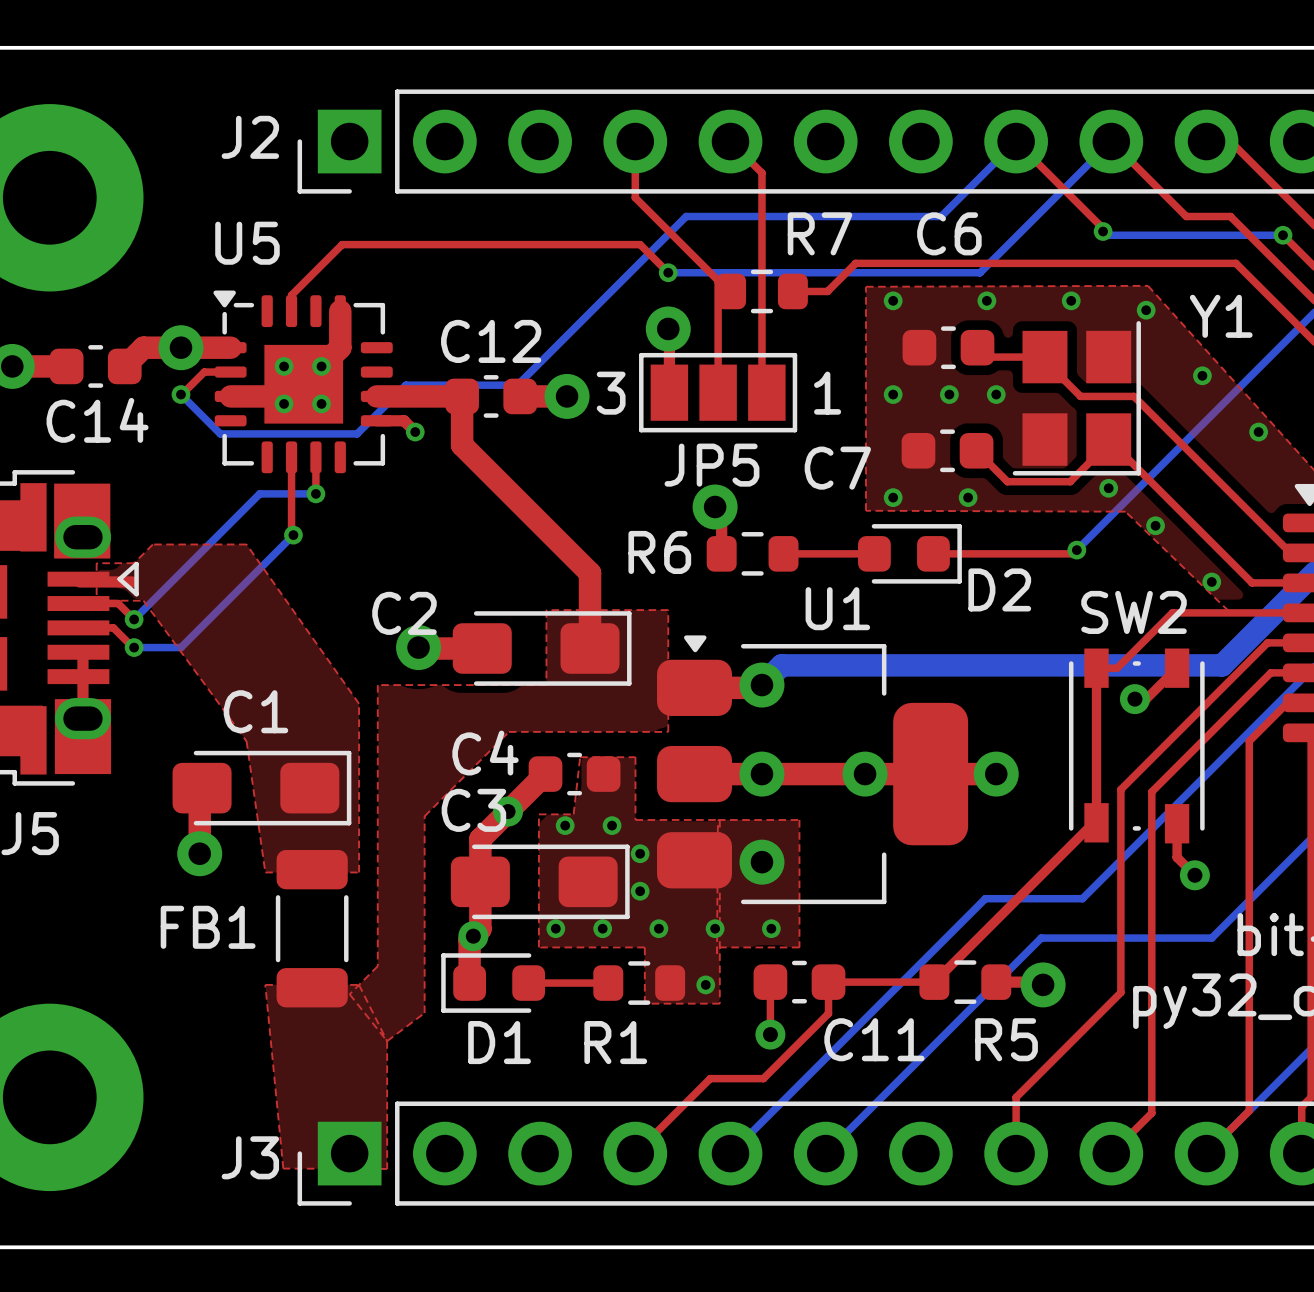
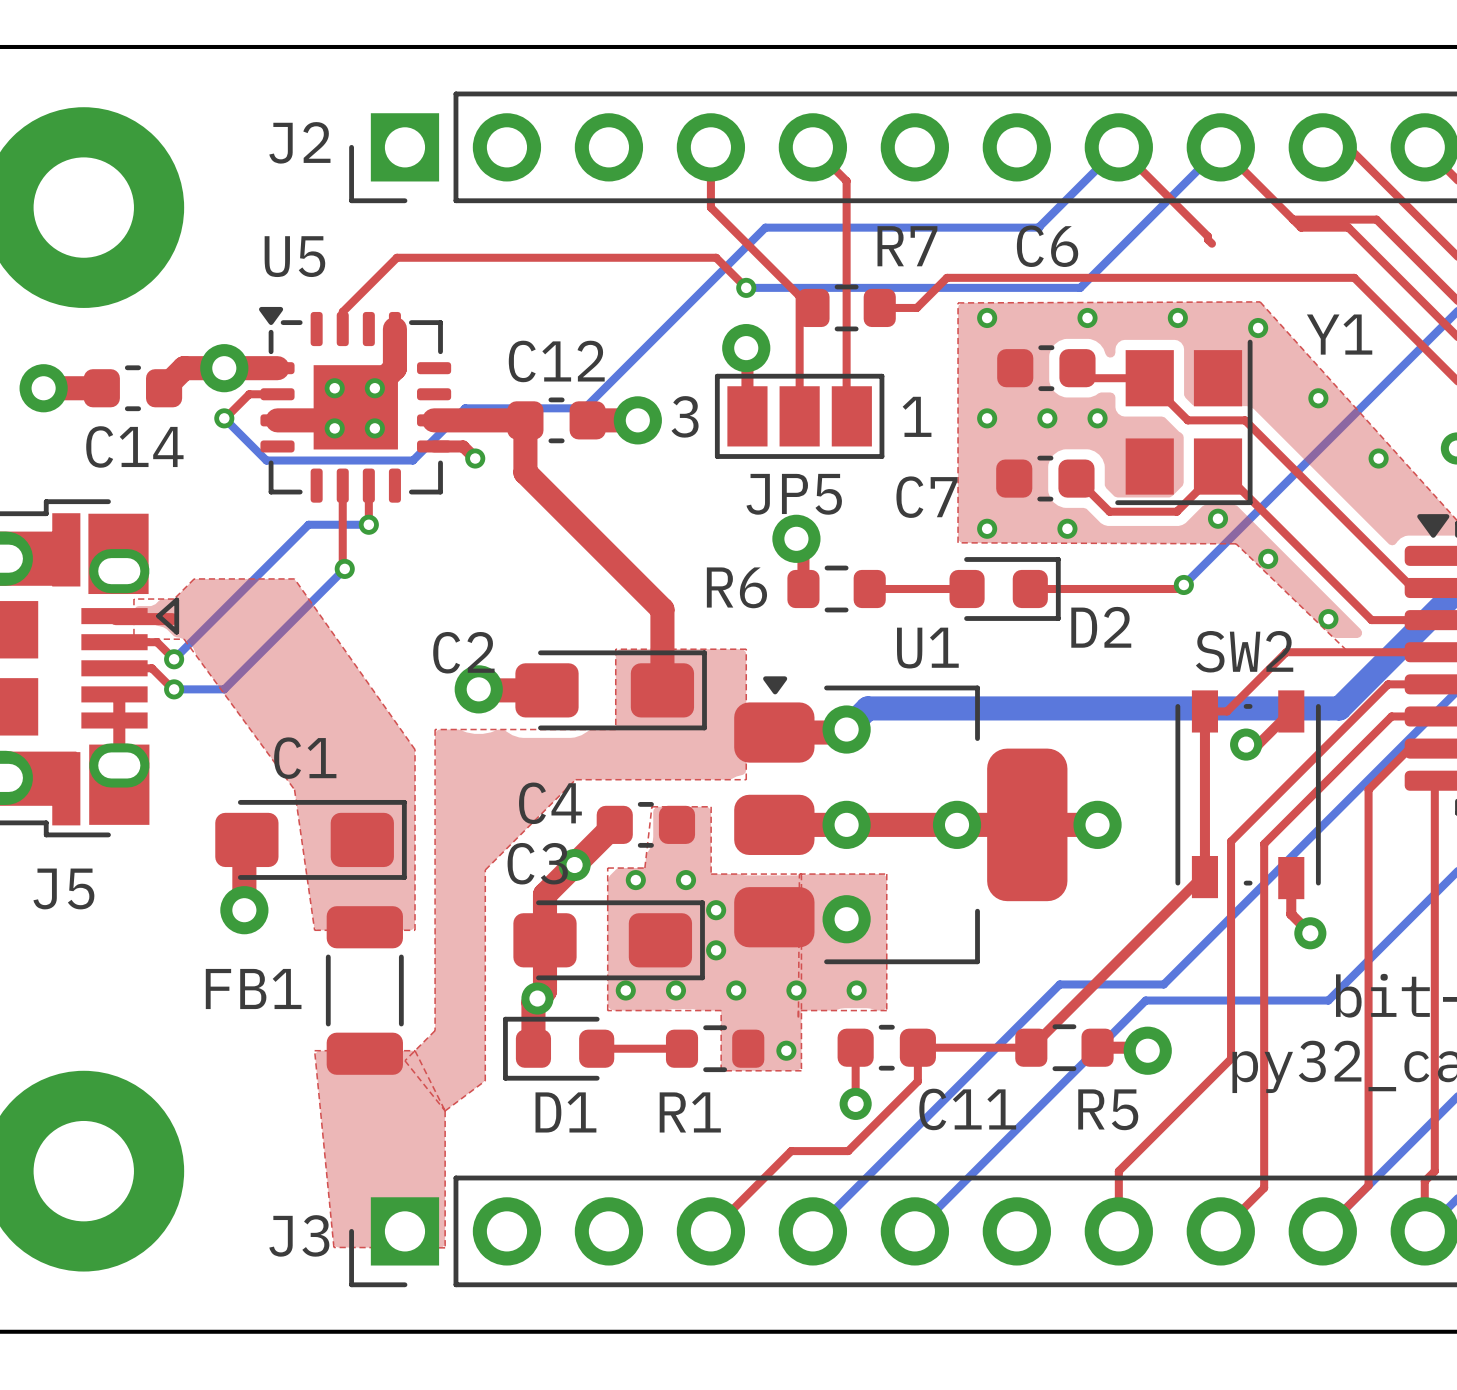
top track: none -> (1293, 219) (1376, 219) (1404, 247)
bottom track: (1103, 231) (1106, 235) (1283, 235) -> none
via: (1103, 231) -> none
via: (1283, 235) -> none
bottom track: (1082, 898) (985, 898) (961, 923) -> (1189, 958) (1163, 984) (1059, 984)

